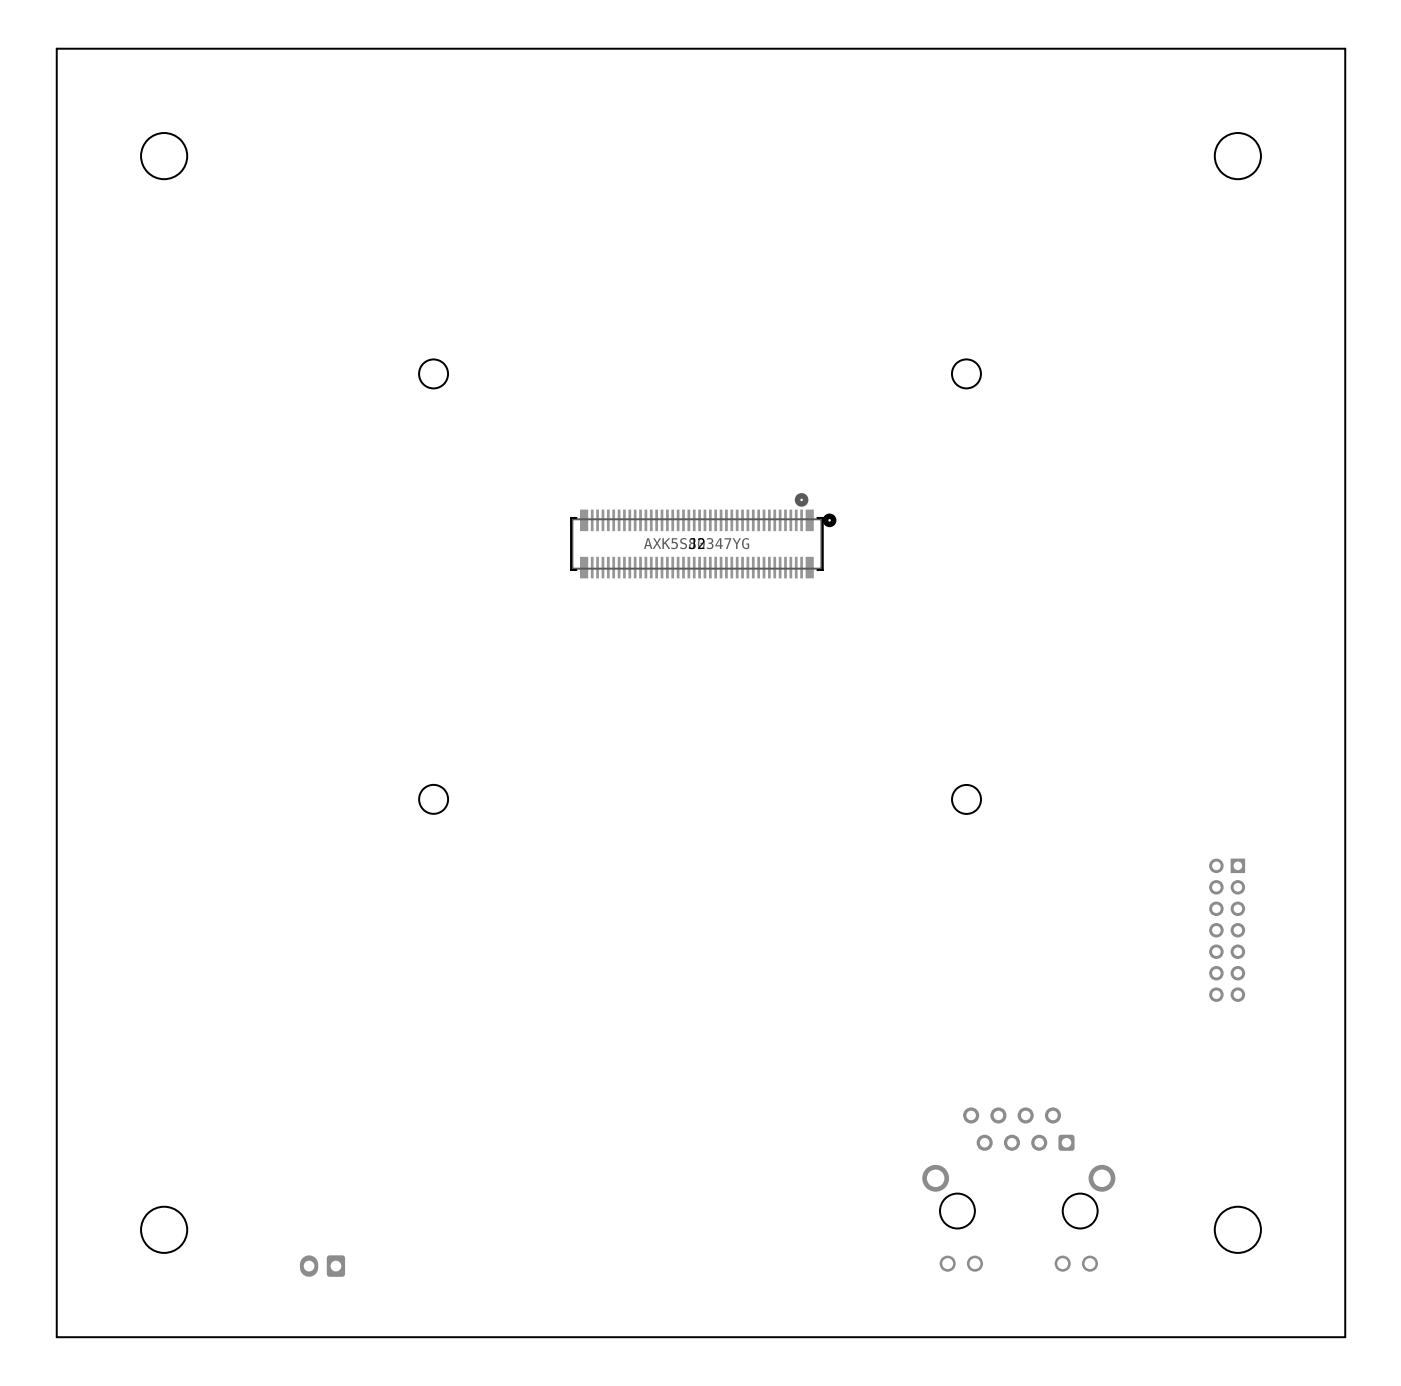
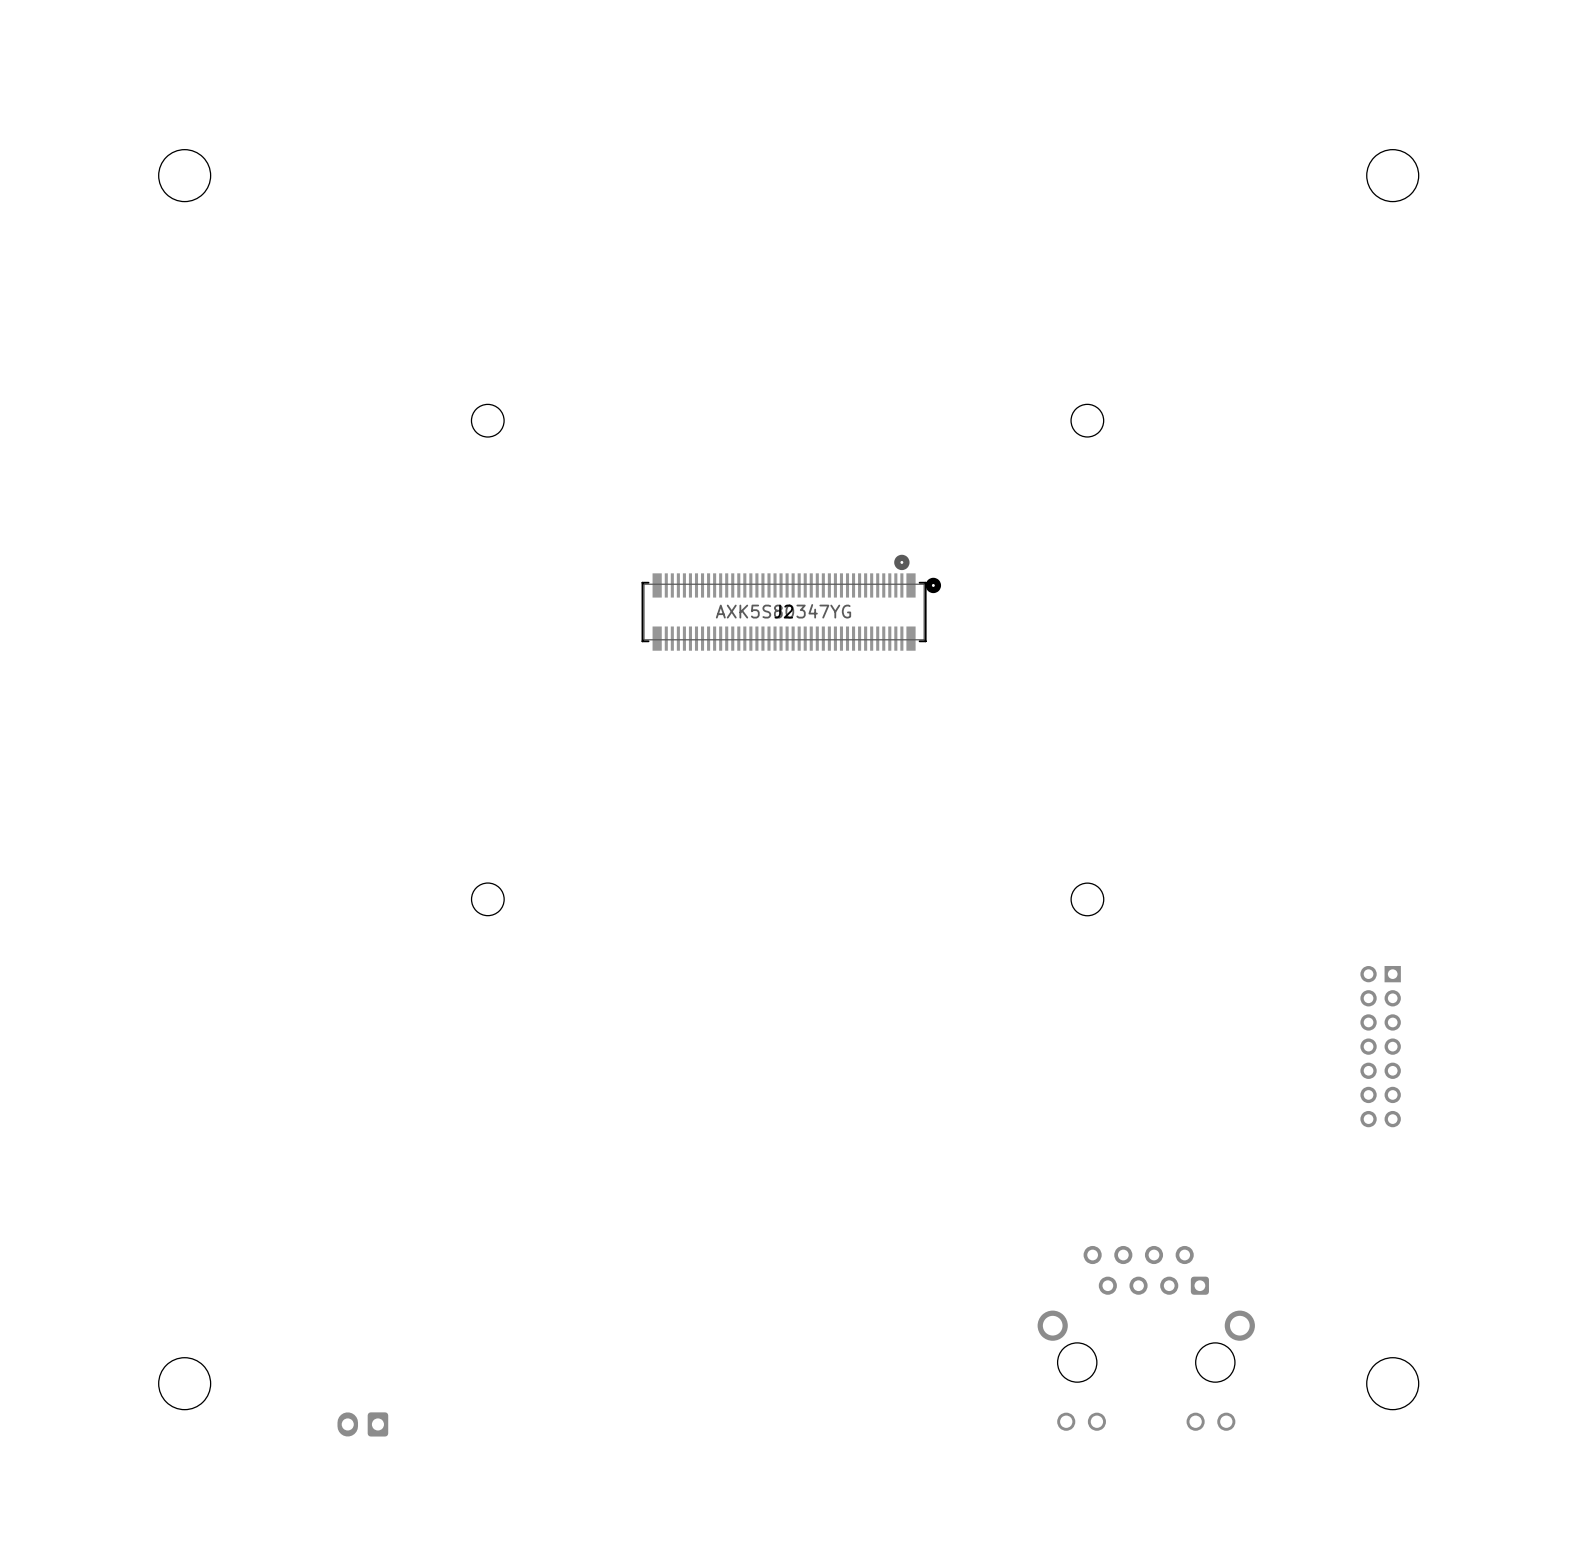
board edge: (1345, 48) (56, 48) (56, 1337) (1345, 1337) (1345, 48) -> none

